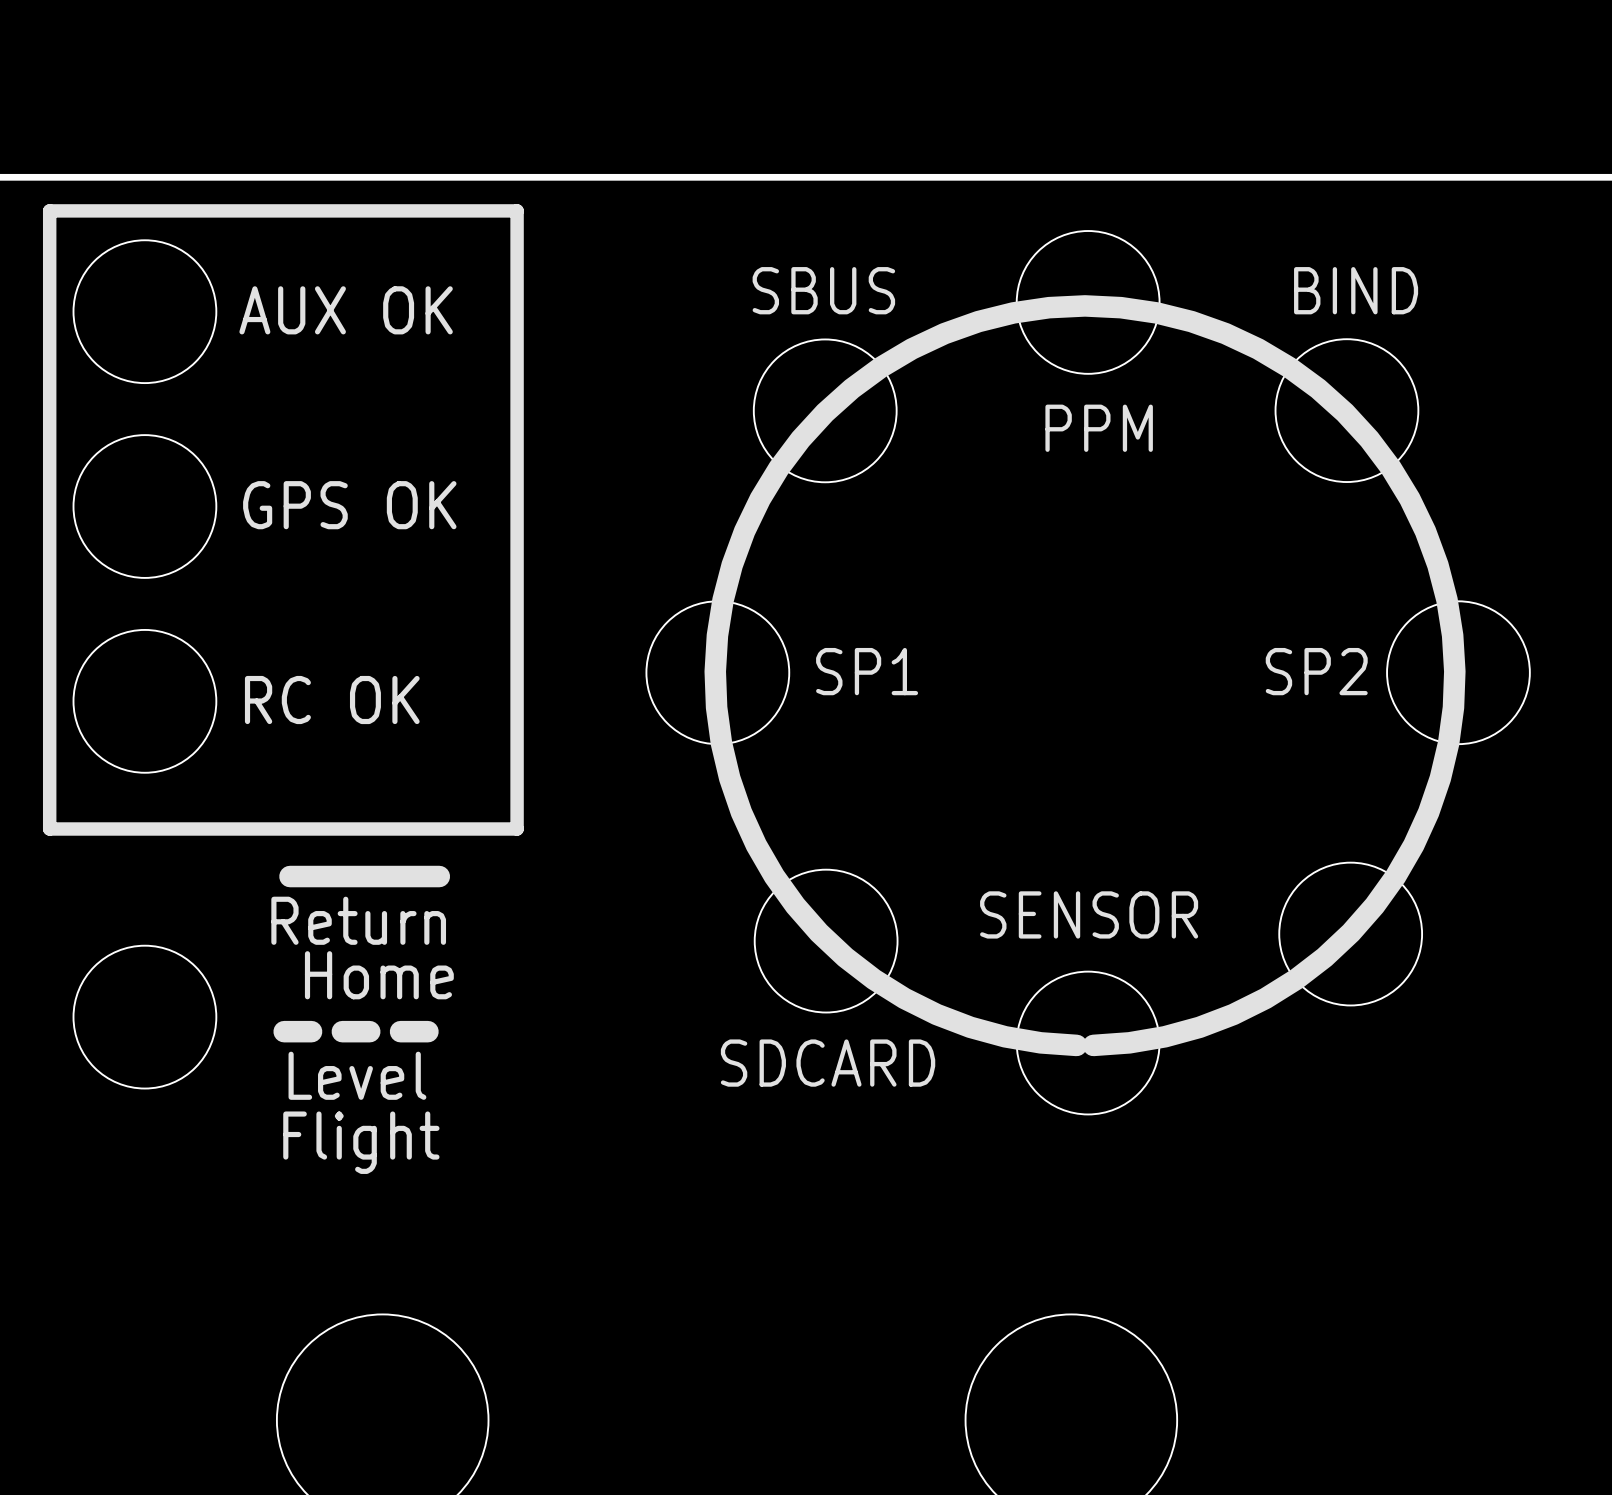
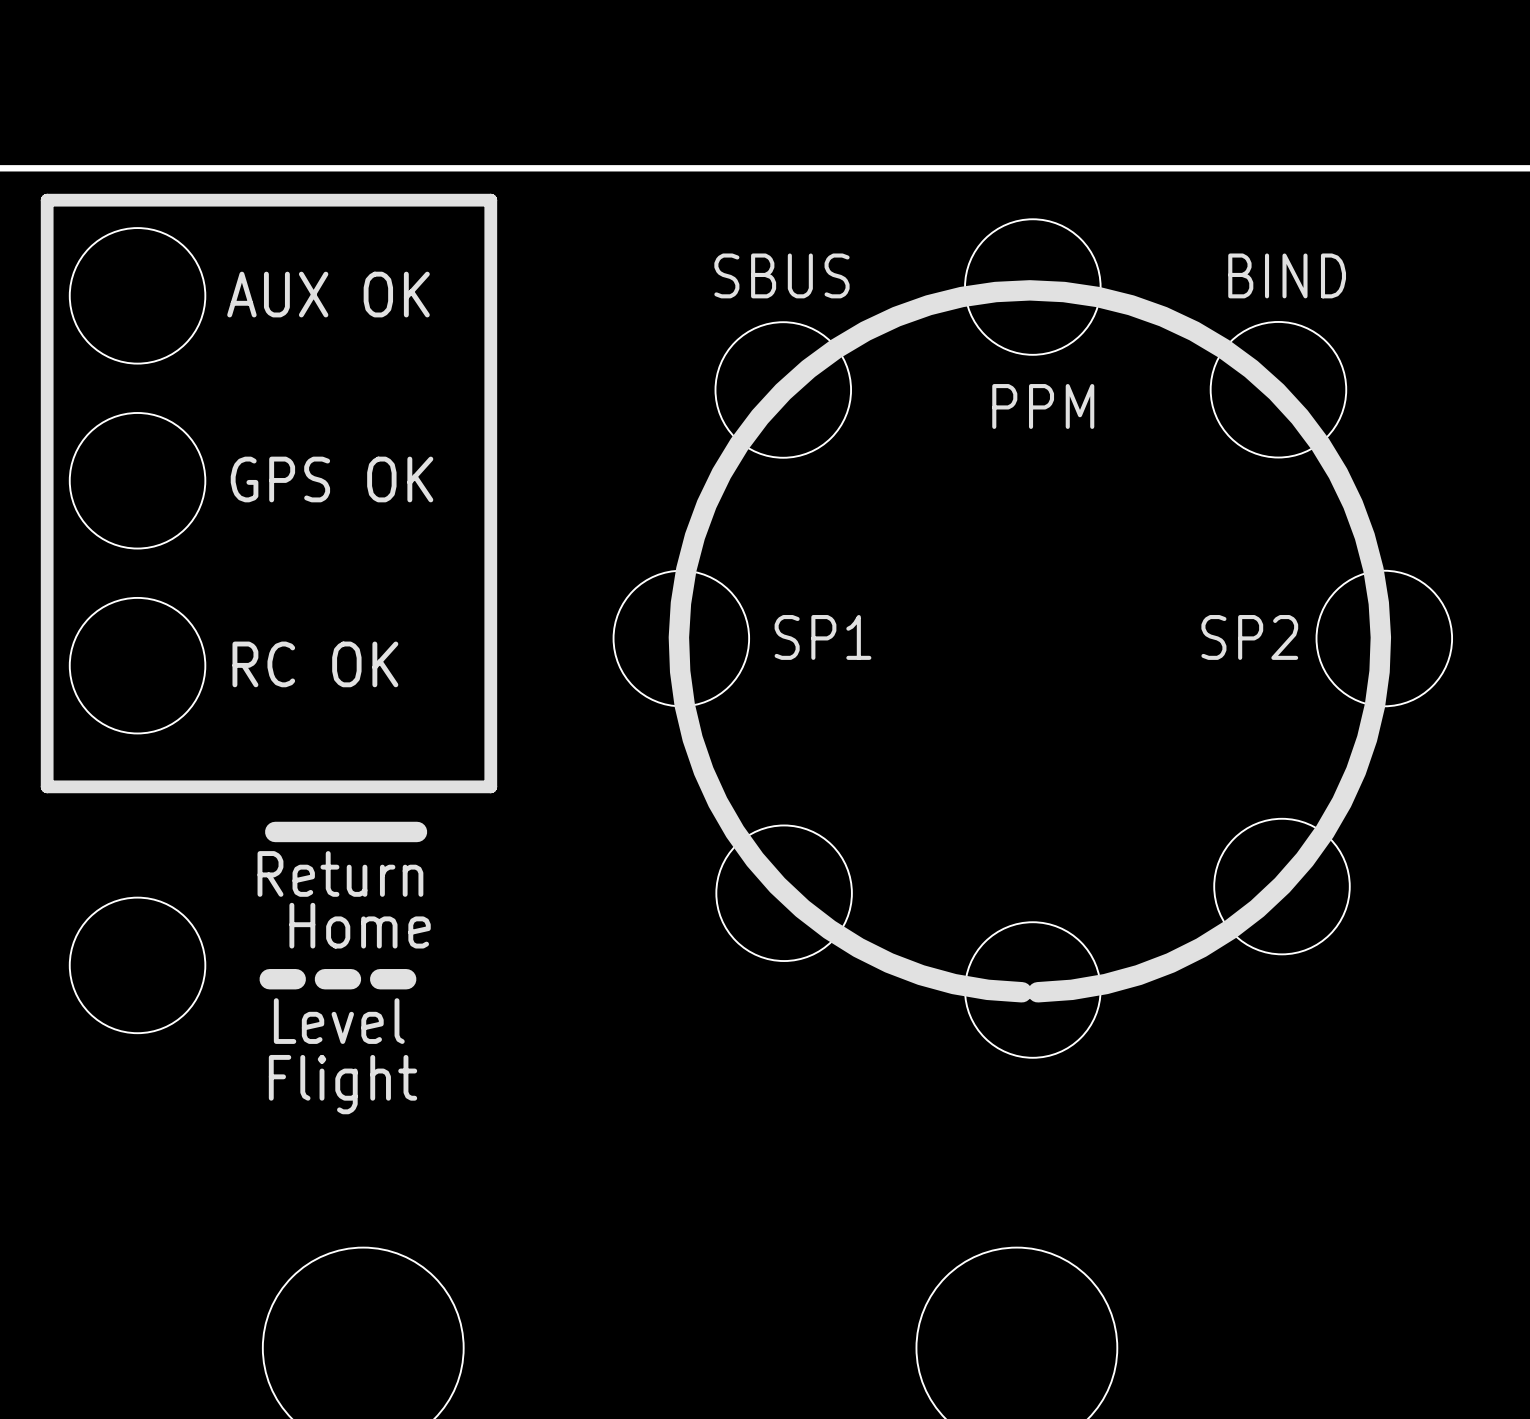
text: SENSOR (1089, 914) -> none
text: SDCARD (828, 1063) -> none

